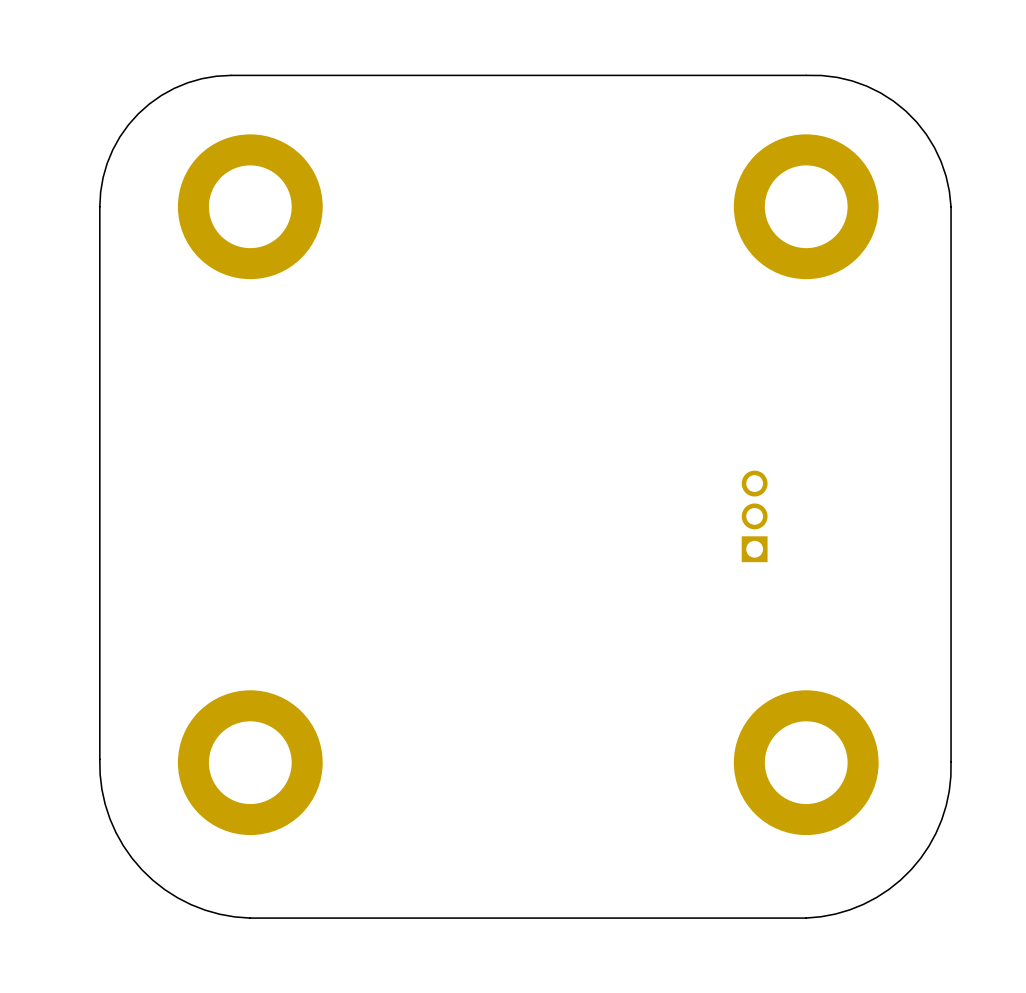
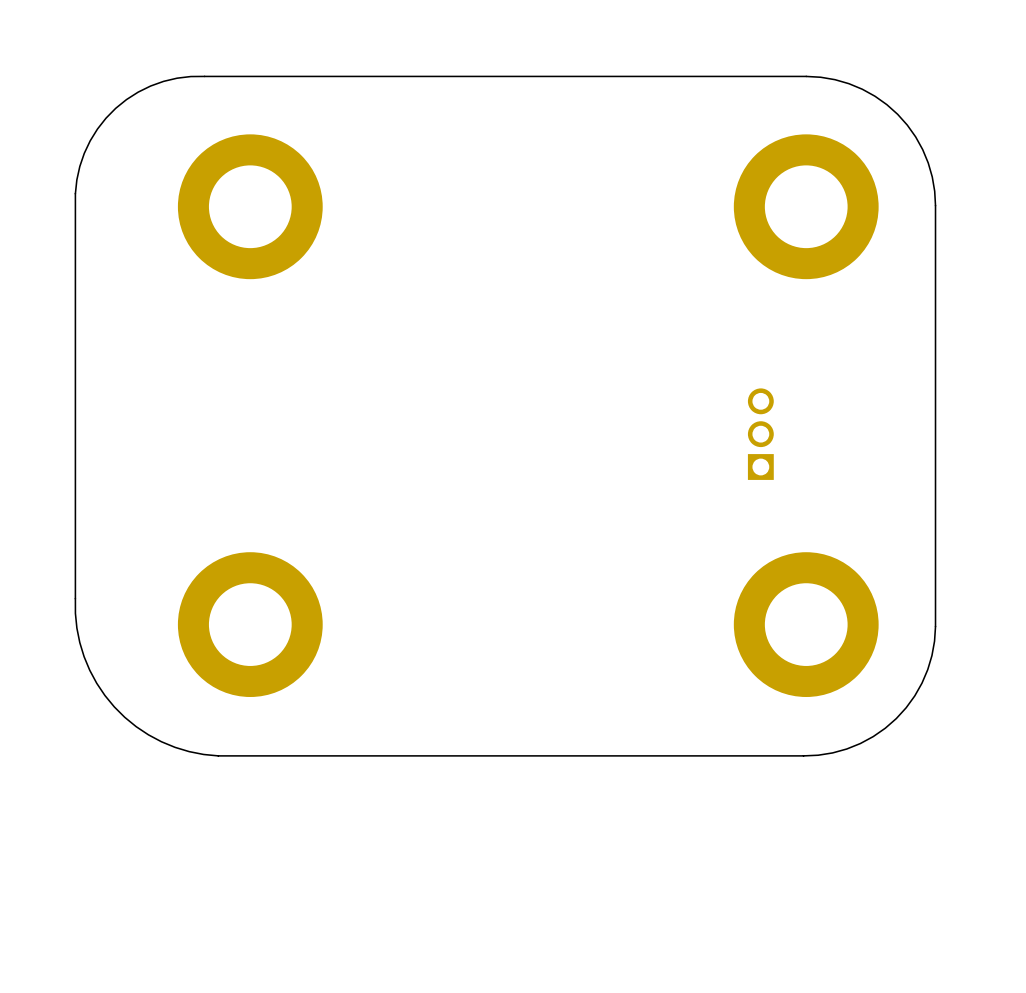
board edge: (806, 75) (216, 76) (201, 78) (174, 88) (149, 104) (128, 124) (119, 136) (107, 163) (100, 192) (99, 206) (100, 774) (105, 804) (115, 832) (132, 858) (152, 880) (191, 904) (219, 914) (249, 918) (806, 918) (835, 914) (876, 897) (900, 880) (920, 858) (941, 819) (950, 776) (951, 206) (949, 191) (941, 161) (926, 134) (916, 122) (893, 101) (880, 92) (852, 80) (821, 75) (806, 75) -> (806, 76) (835, 79) (862, 89) (886, 104) (897, 114) (915, 136) (922, 149) (932, 176) (934, 191) (934, 641) (927, 669) (922, 683) (914, 695) (896, 718) (885, 728) (860, 743) (846, 749) (818, 755) (218, 755) (189, 751) (161, 741) (136, 726) (114, 706) (96, 683) (84, 656) (75, 613) (75, 193) (76, 179) (84, 153) (97, 129) (115, 108) (138, 92) (150, 86) (163, 81) (190, 76) (806, 76)
part position: (754, 516) -> (760, 434)
part position: (250, 762) -> (250, 624)
part position: (806, 762) -> (806, 624)

